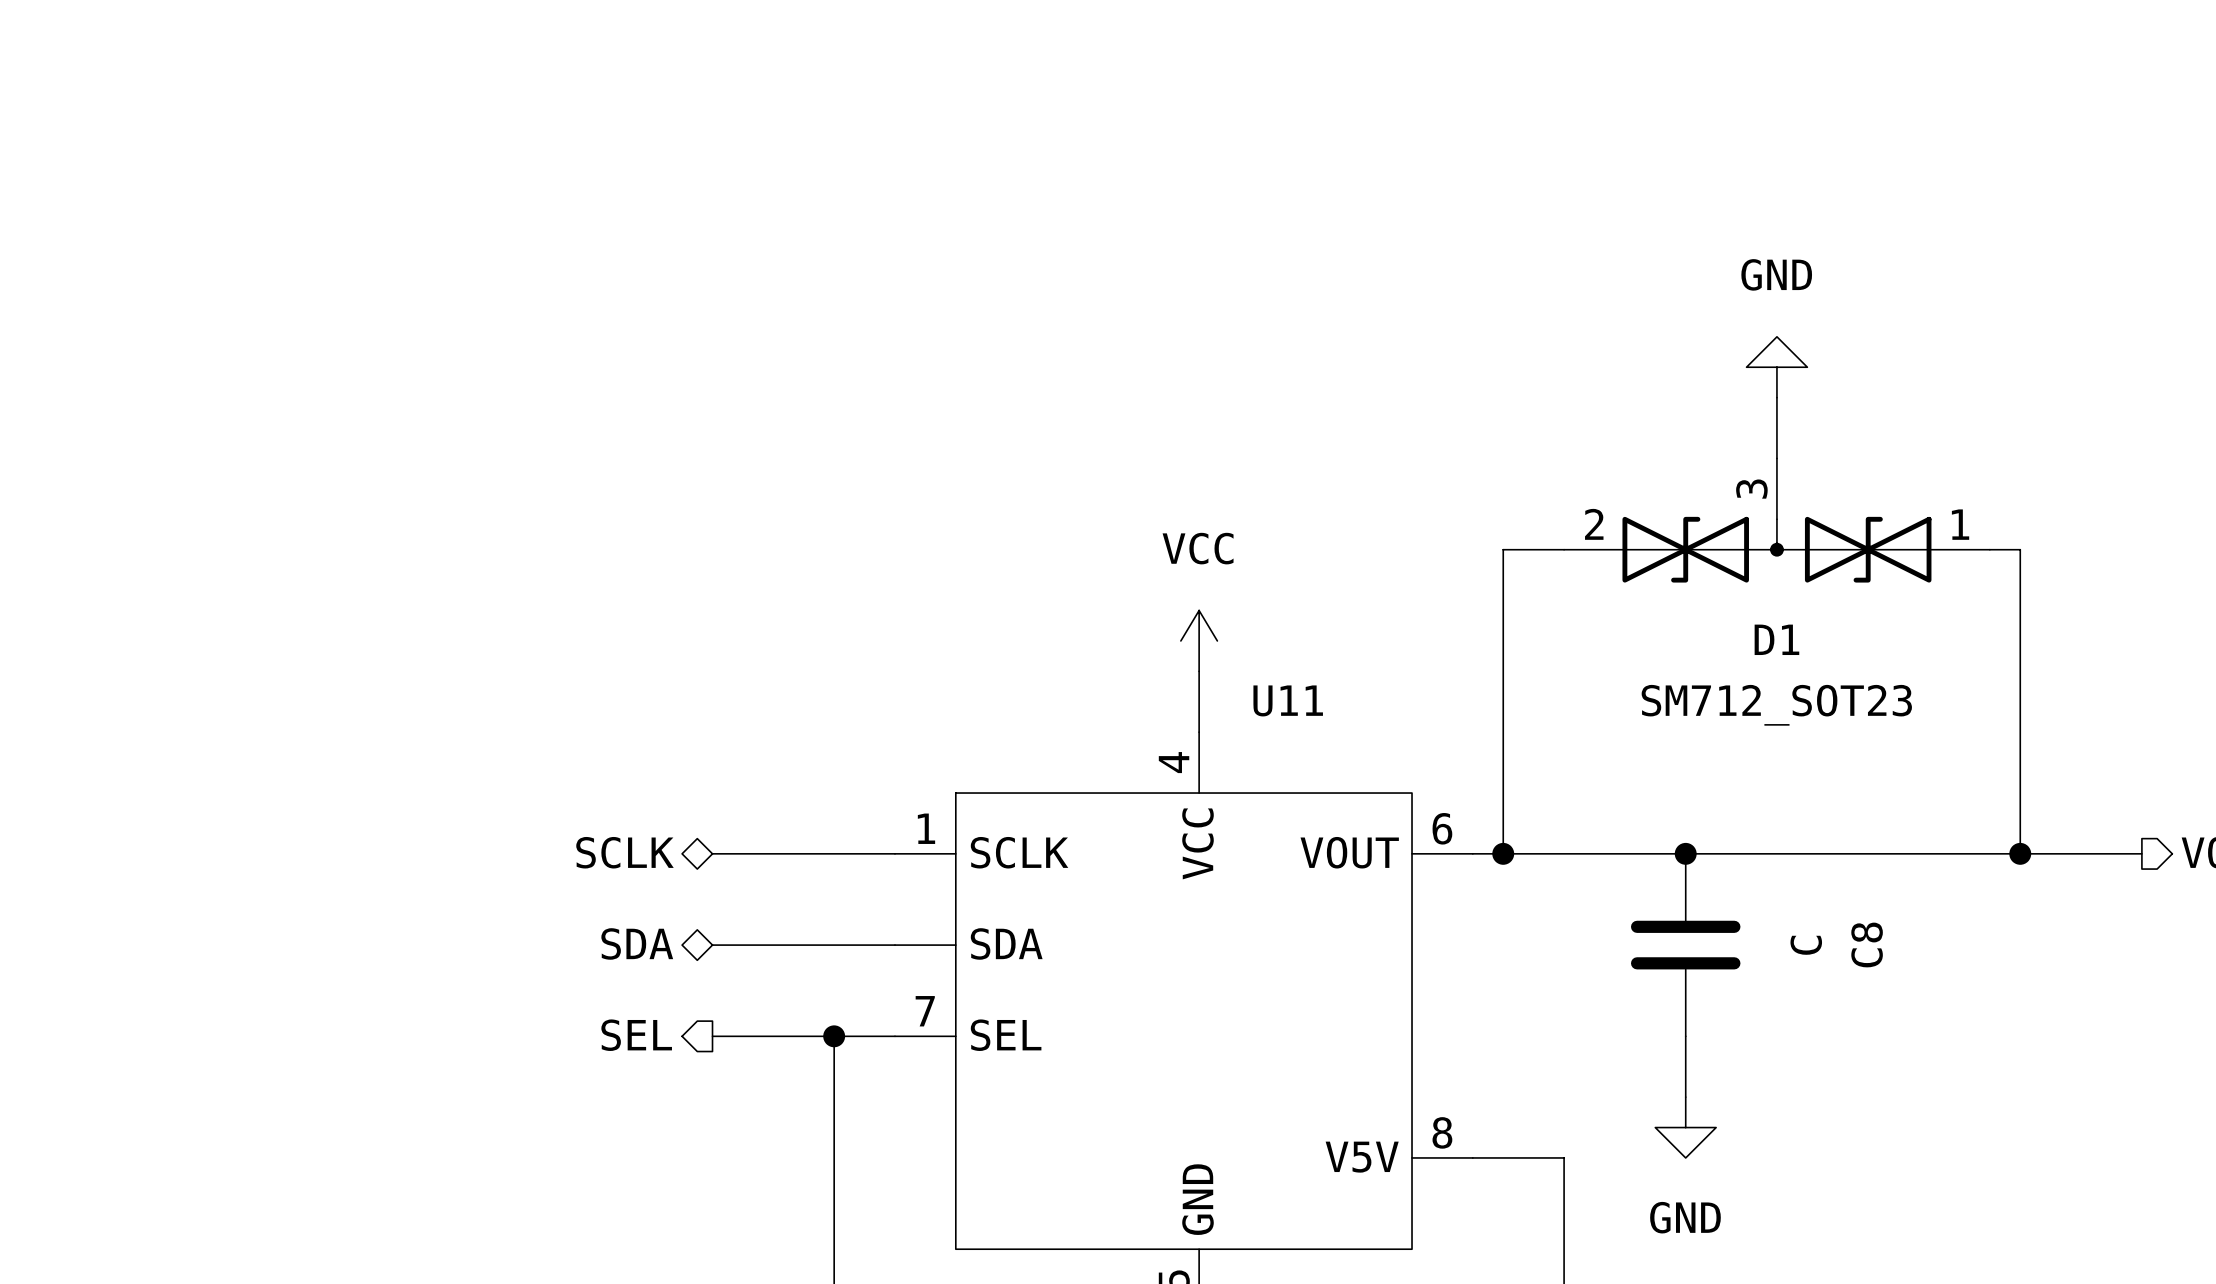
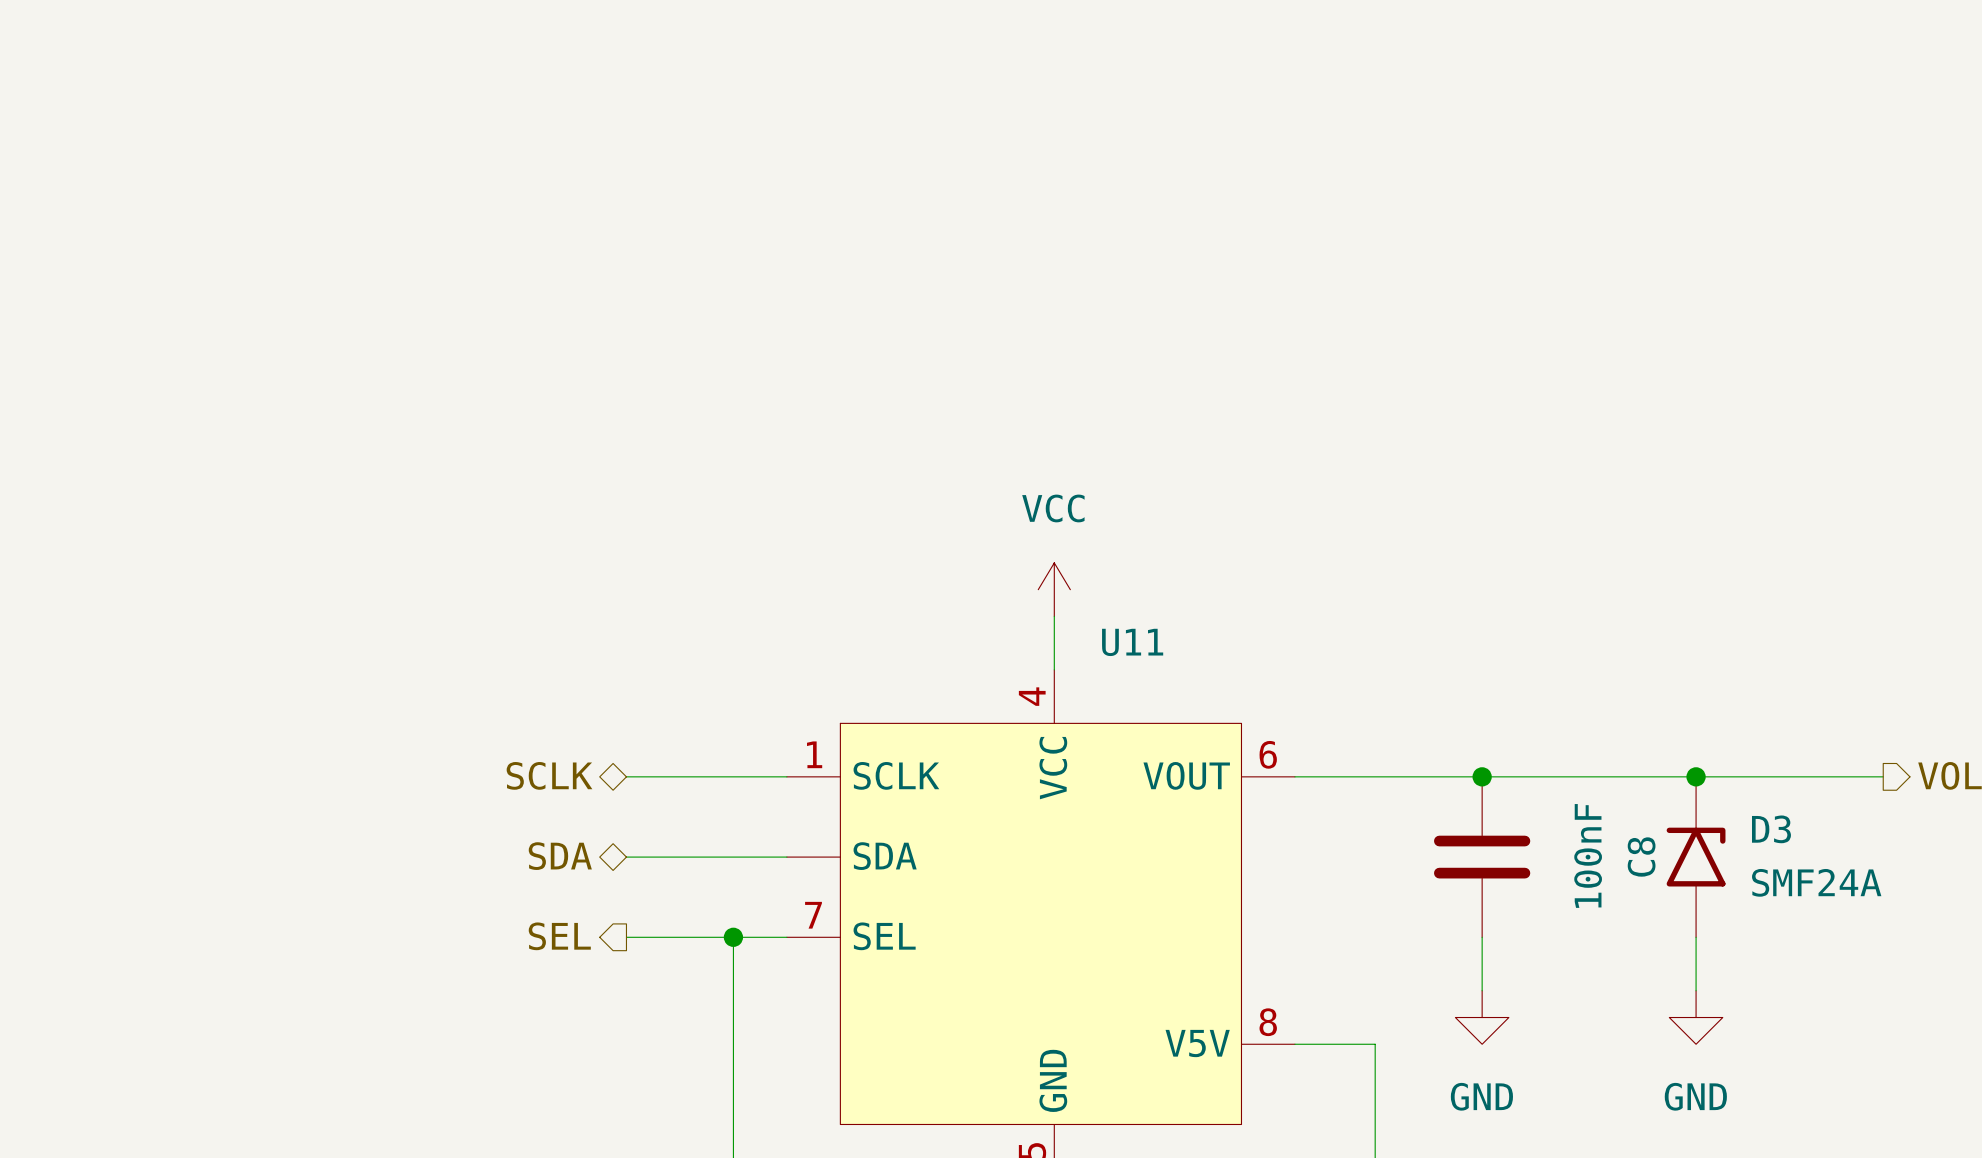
power symbol: GND (1776, 367) -> none
wire: (1776, 397) (1776, 458) -> none
D1: SM712_SOT23 (1776, 520) -> none
wire: (1564, 549) (1503, 549) (1503, 853) -> none
wire: (1989, 549) (2020, 549) (2020, 853) -> none
junction: (1503, 853) -> none
junction position: (2020, 853) -> (1696, 776)
C8 value: C (1806, 945) -> 100nF (1588, 855)
D3: none -> SMF24A (1696, 857)
wire: none -> (1696, 937) (1696, 990)
power symbol: none -> GND (1696, 1017)

